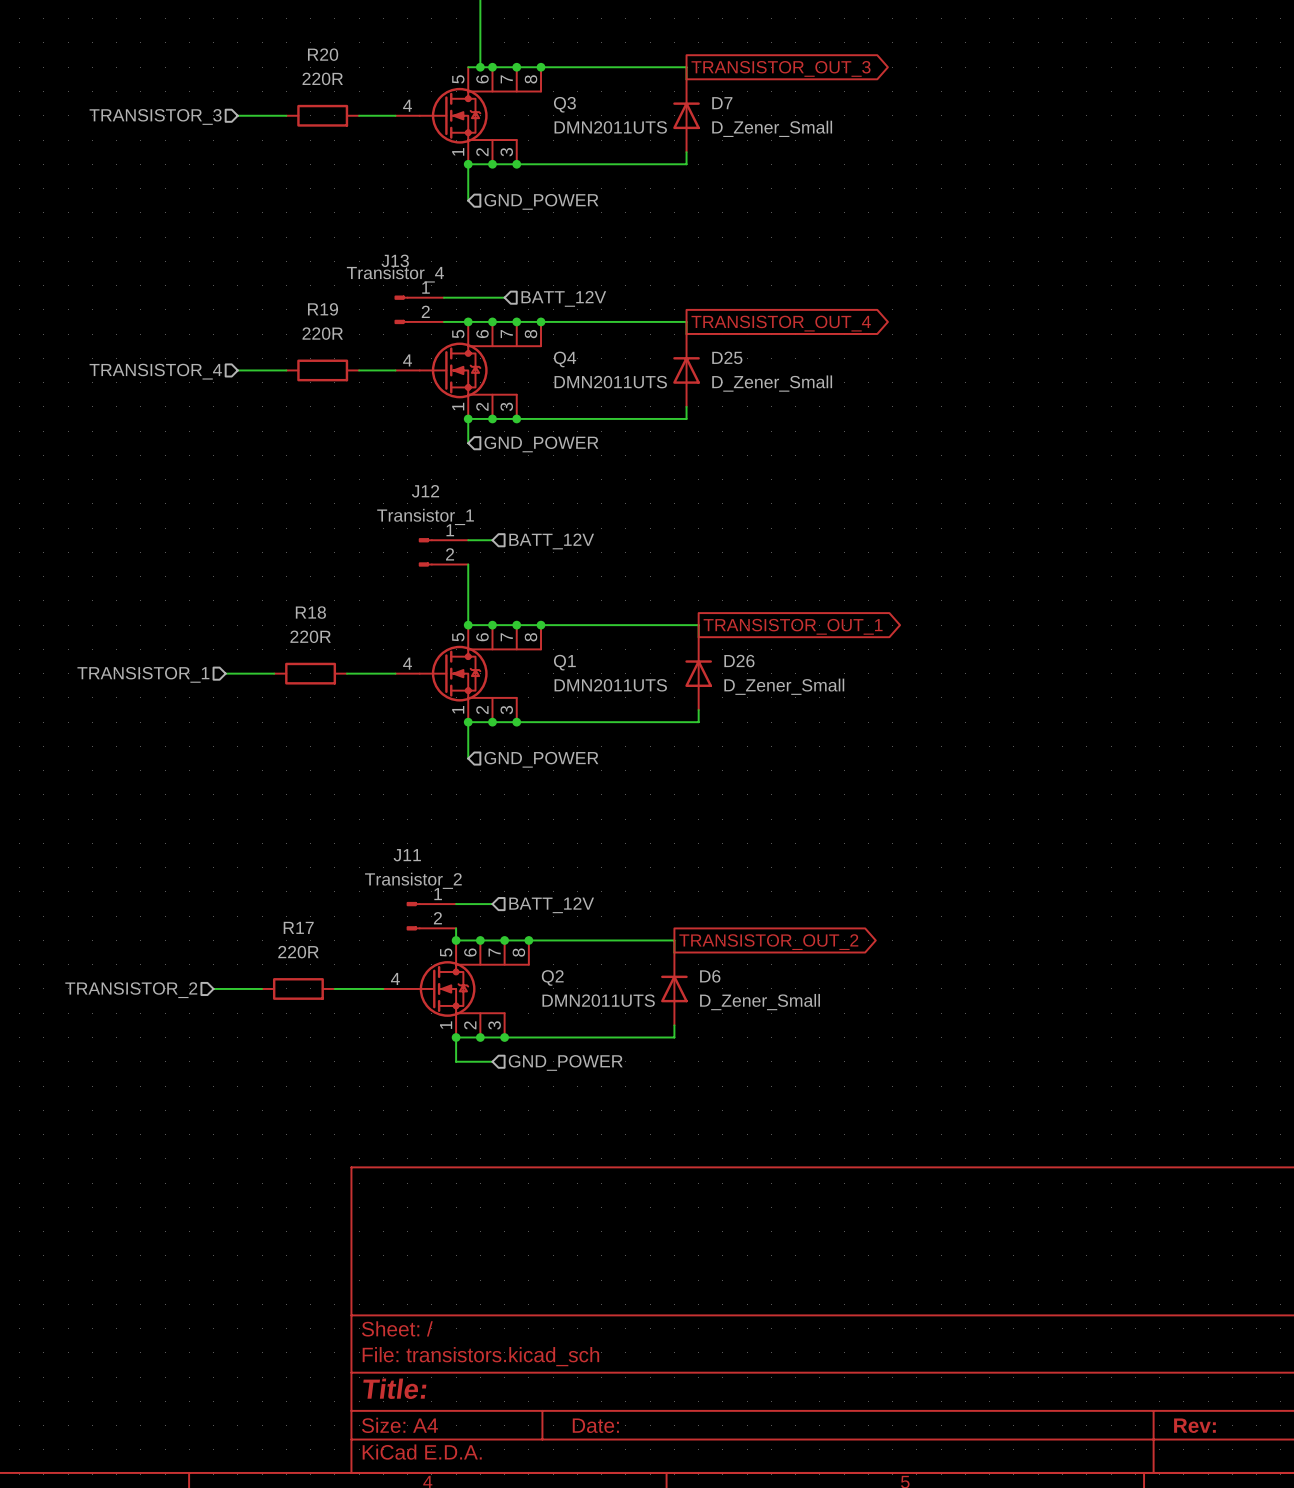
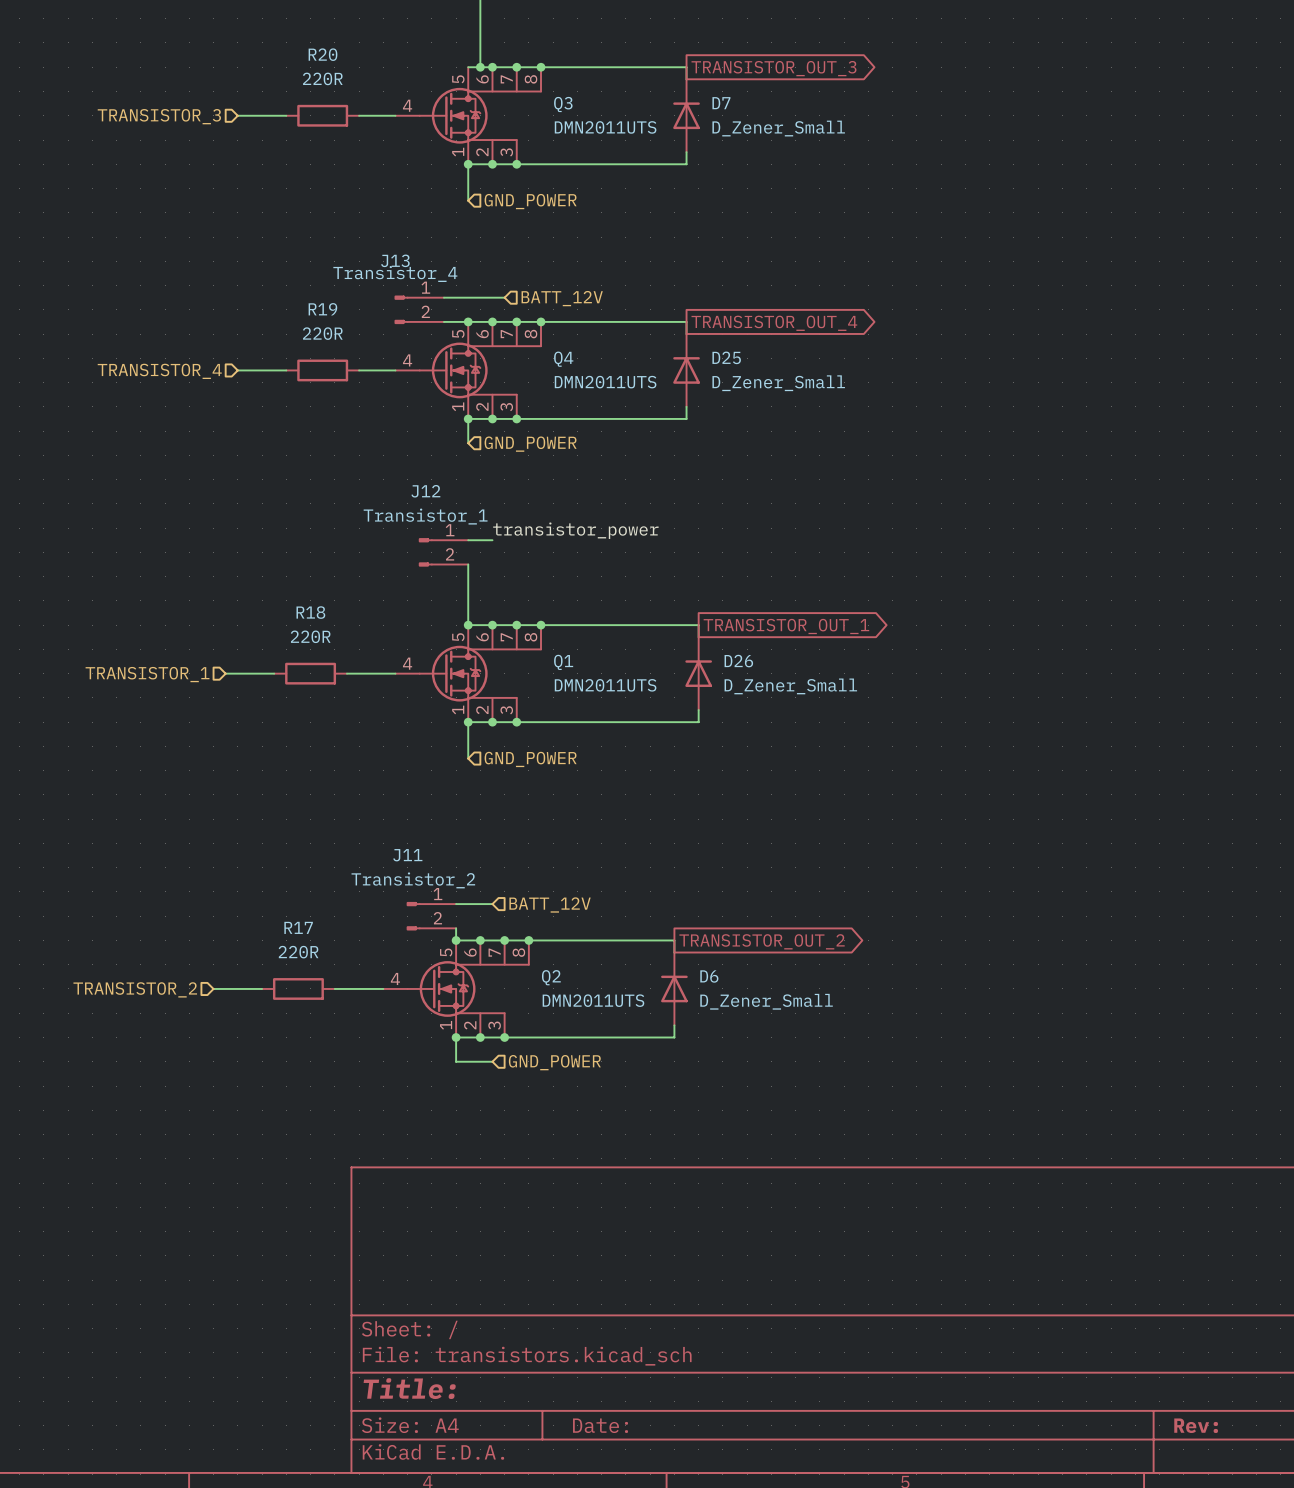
label: none -> transistor_power (575, 530)
hierarchical label: BATT_12V (551, 541) -> none

